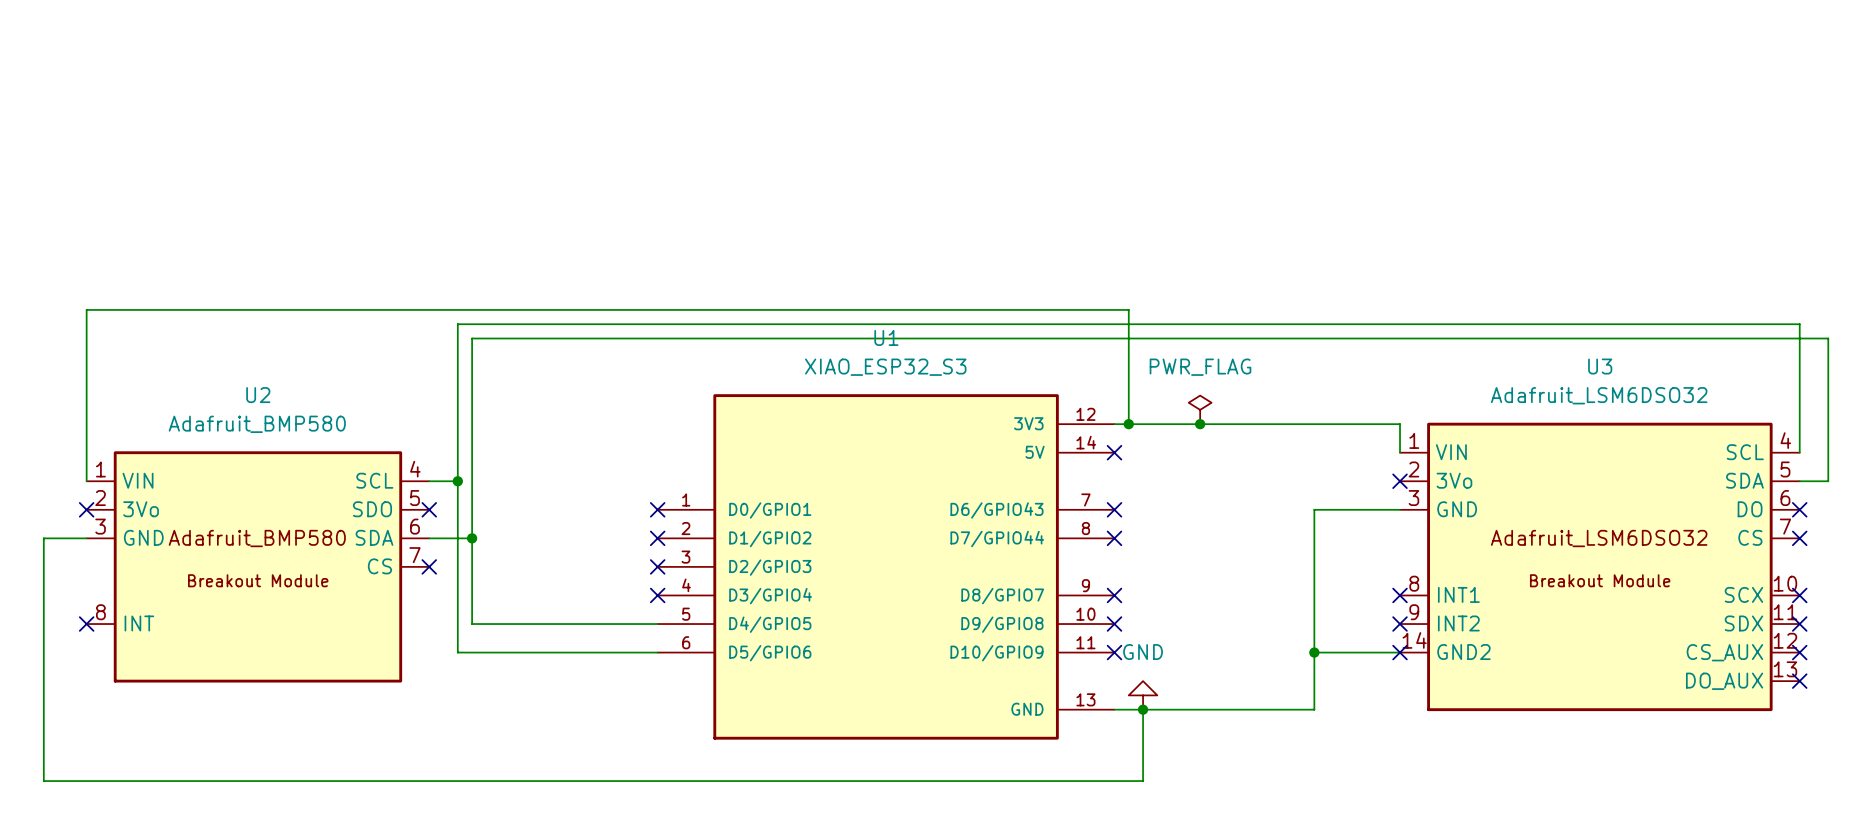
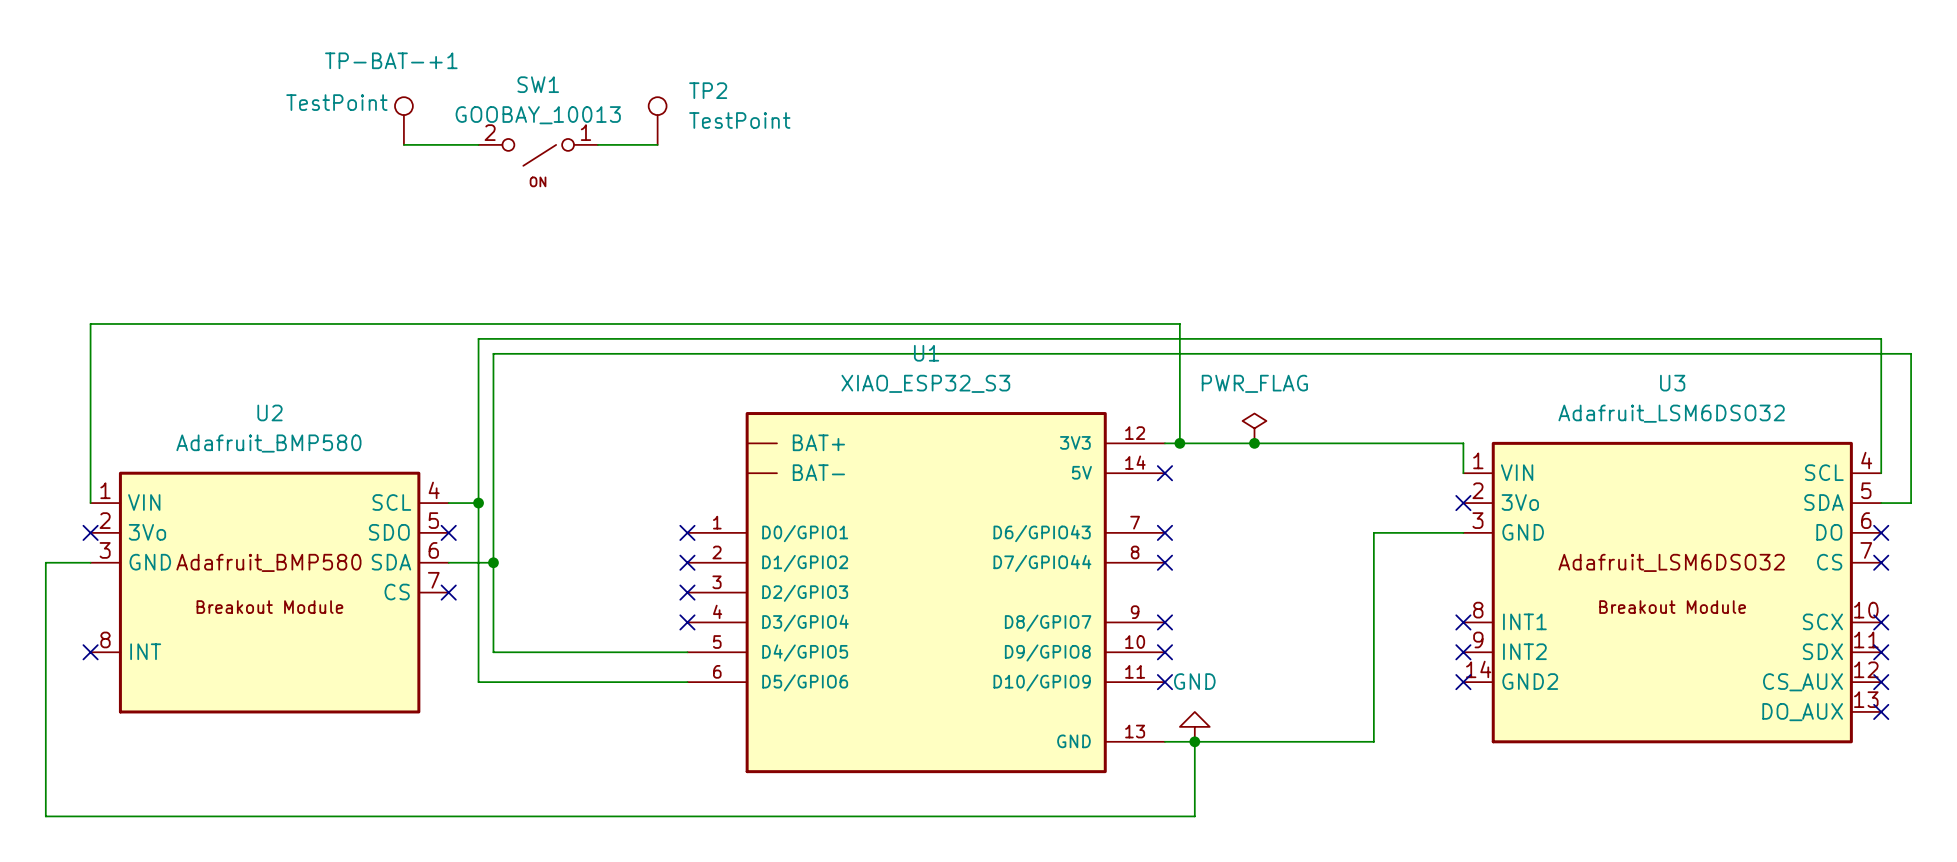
TP-BAT-+1: none -> TestPoint (403, 121)
TP2: none -> TestPoint (657, 121)
wire: none -> (403, 144) (478, 144)
wire: none -> (597, 144) (657, 144)
SW1: none -> GOOBAY_10013 (538, 152)
U1 symbol: [657, 394, 1115, 740] -> [687, 412, 1165, 774]
wire: (1314, 652) (1400, 652) -> none
junction: (1314, 652) -> none

